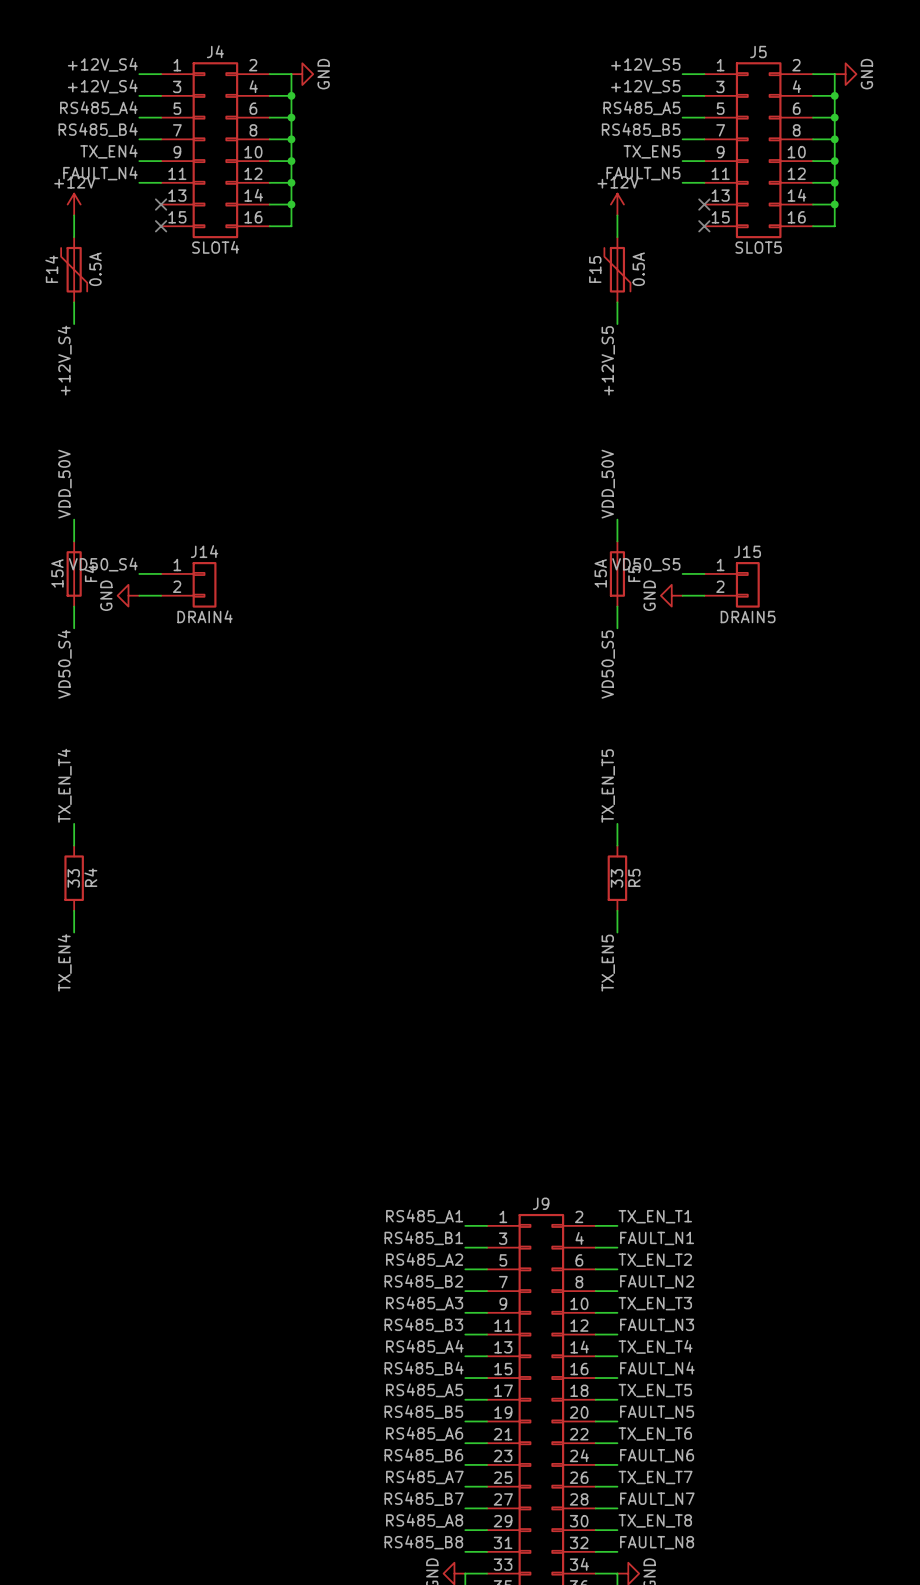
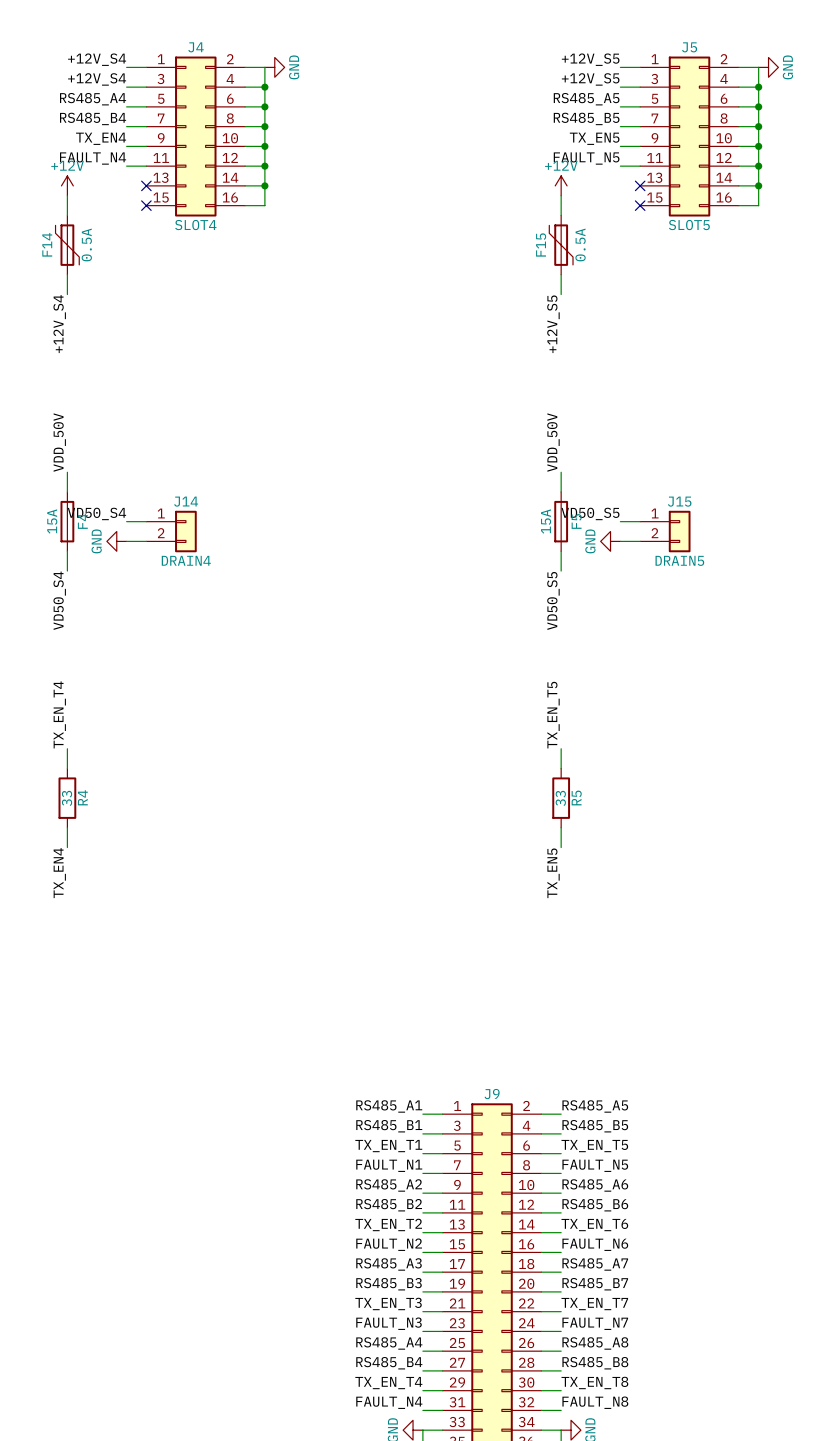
label: TX_EN_T1 (655, 1216) -> RS485_A5 (595, 1106)
label: FAULT_N1 (657, 1238) -> RS485_B5 (595, 1126)
label: RS485_A2 (424, 1259) -> TX_EN_T1 (388, 1146)
label: TX_EN_T2 (655, 1260) -> TX_EN_T5 (594, 1146)
label: RS485_B2 (423, 1281) -> FAULT_N1 (389, 1165)
label: FAULT_N2 (657, 1281) -> FAULT_N5 (595, 1165)
label: RS485_A3 (424, 1303) -> RS485_A2 (389, 1185)
label: TX_EN_T3 (655, 1303) -> RS485_A6 (595, 1185)
label: RS485_B3 (423, 1325) -> RS485_B2 (389, 1205)
label: FAULT_N3 (657, 1325) -> RS485_B6 (595, 1205)
label: RS485_A4 (424, 1346) -> TX_EN_T2 (388, 1224)
label: TX_EN_T4 (655, 1346) -> TX_EN_T6 (594, 1225)
label: RS485_B4 (424, 1368) -> FAULT_N2 (389, 1244)
label: FAULT_N4 (657, 1368) -> FAULT_N6 (595, 1244)
label: RS485_A5 (424, 1390) -> RS485_A3 (389, 1264)
label: TX_EN_T5 (655, 1390) -> RS485_A7 (595, 1264)
label: RS485_B5 (423, 1412) -> RS485_B3 (389, 1284)
label: FAULT_N5 (657, 1412) -> RS485_B7 (595, 1284)
label: RS485_A6 (424, 1433) -> TX_EN_T3 (388, 1303)
label: TX_EN_T6 (655, 1434) -> TX_EN_T7 (594, 1304)
label: RS485_B6 (423, 1455) -> FAULT_N3 (389, 1323)
label: FAULT_N6 (657, 1455) -> FAULT_N7 (595, 1323)
label: RS485_A7 (424, 1477) -> RS485_A4 (389, 1343)
label: TX_EN_T7 (655, 1477) -> RS485_A8 (595, 1343)
label: RS485_B7 (424, 1498) -> RS485_B4 (389, 1363)
label: FAULT_N7 (657, 1499) -> RS485_B8 (595, 1363)
label: RS485_A8 (424, 1520) -> TX_EN_T4 (388, 1383)
label: RS485_B8 (423, 1542) -> FAULT_N4 (389, 1402)

